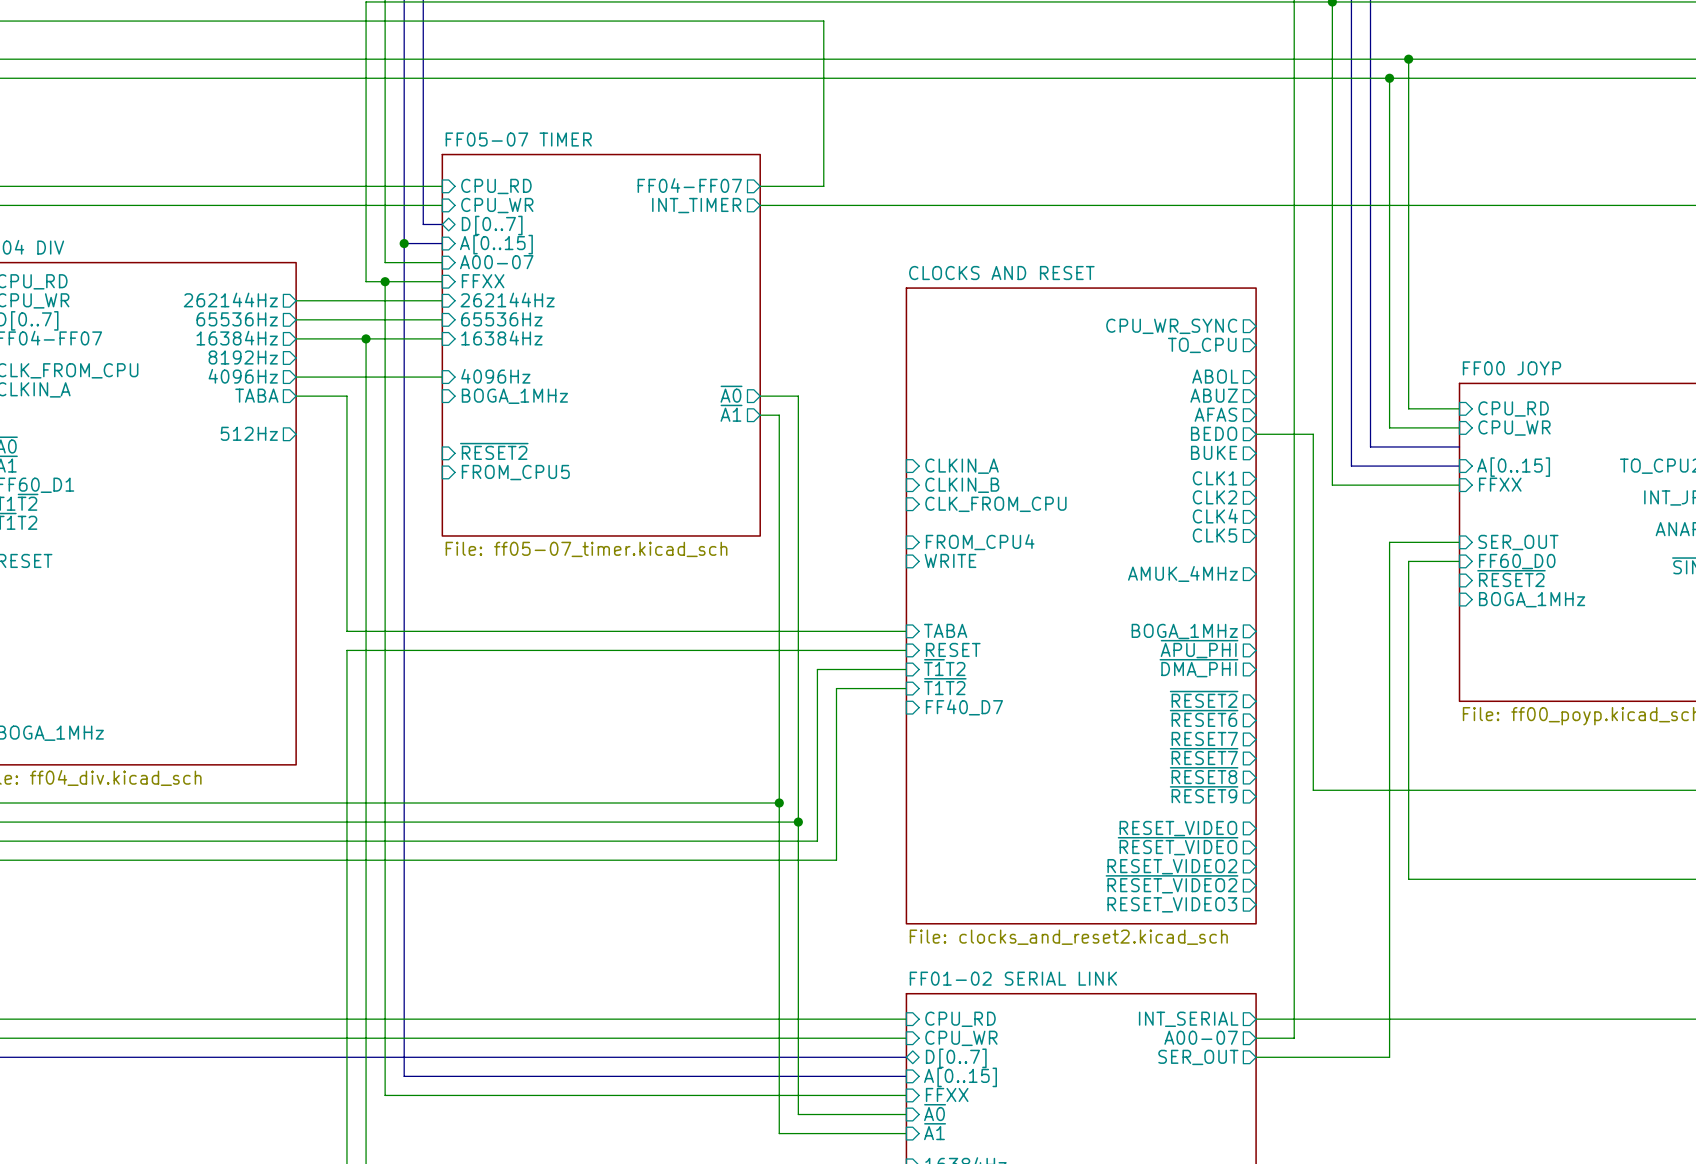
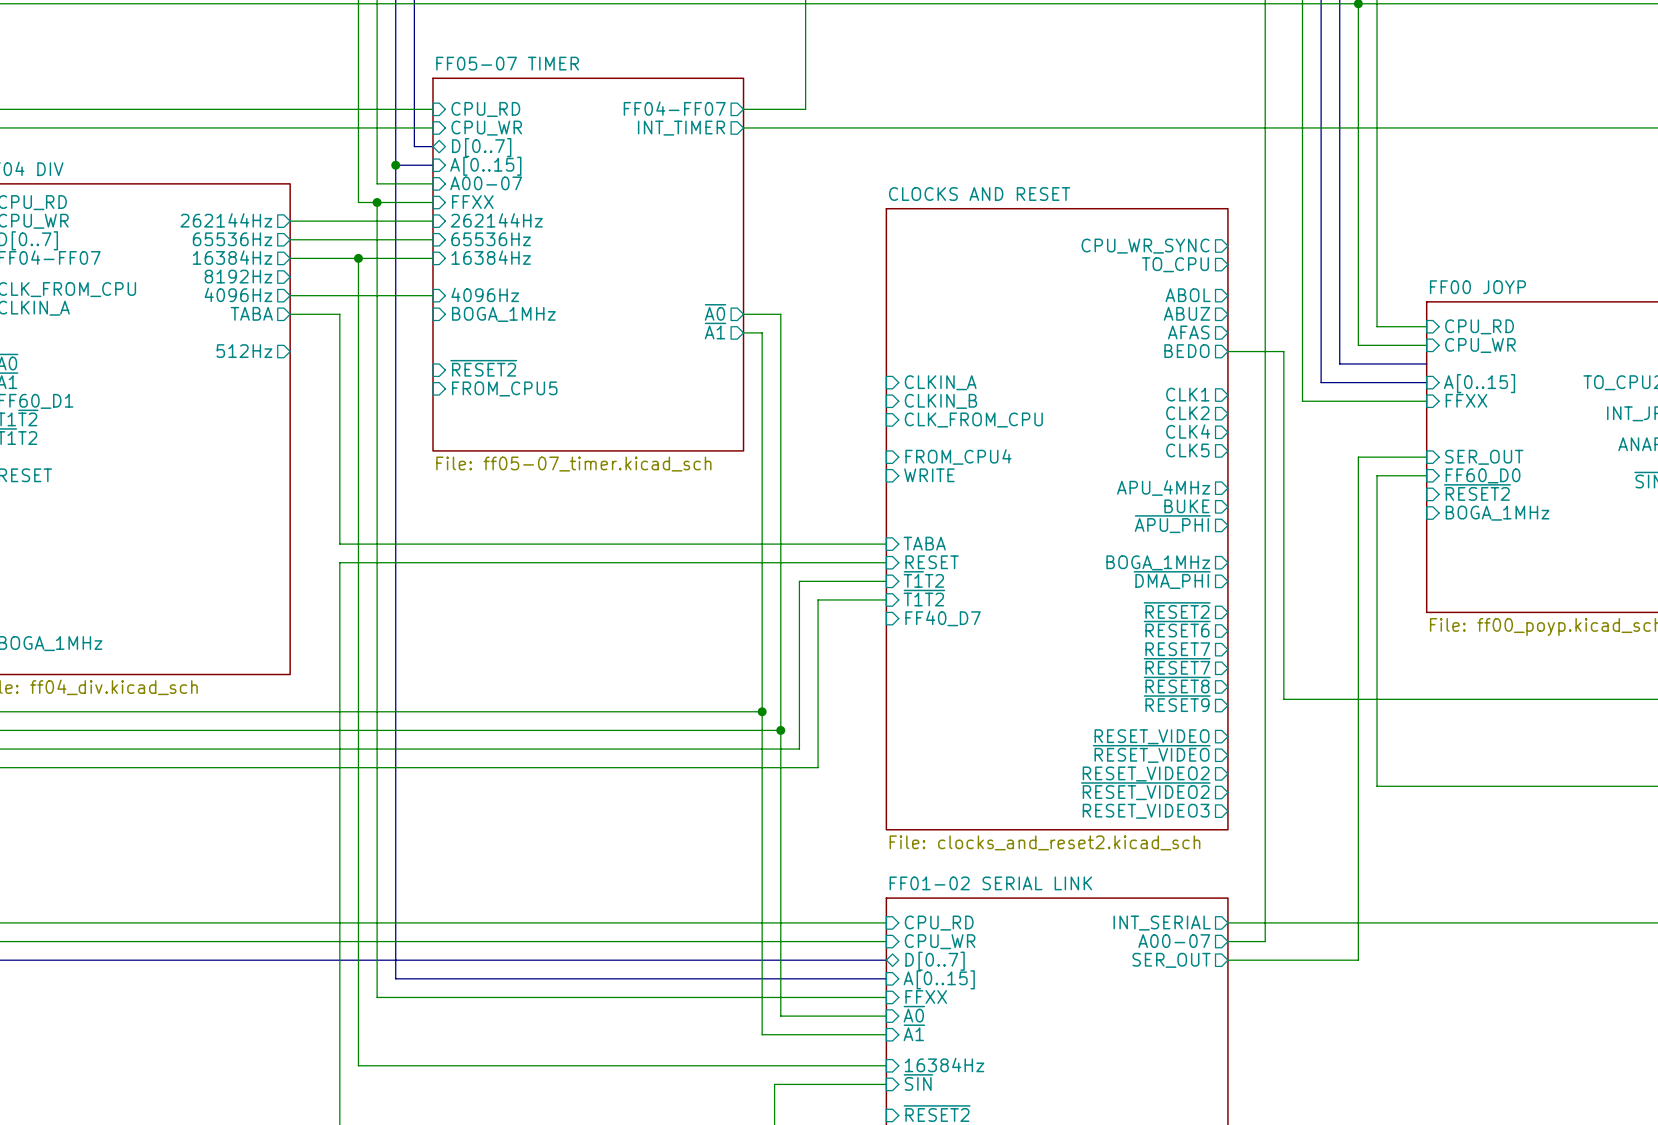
sheet pin position: BUKE (1214, 452) -> BUKE (1186, 506)
sheet pin: AMUK_4MHz (1182, 573) -> APU_4MHz (1163, 488)
sheet pin: none -> ~{APU_PHI} (1172, 524)
sheet pin: BOGA_1MHz (1184, 631) -> none
sheet pin: ~{APU_PHI} (1199, 649) -> BOGA_1MHz (1158, 562)

